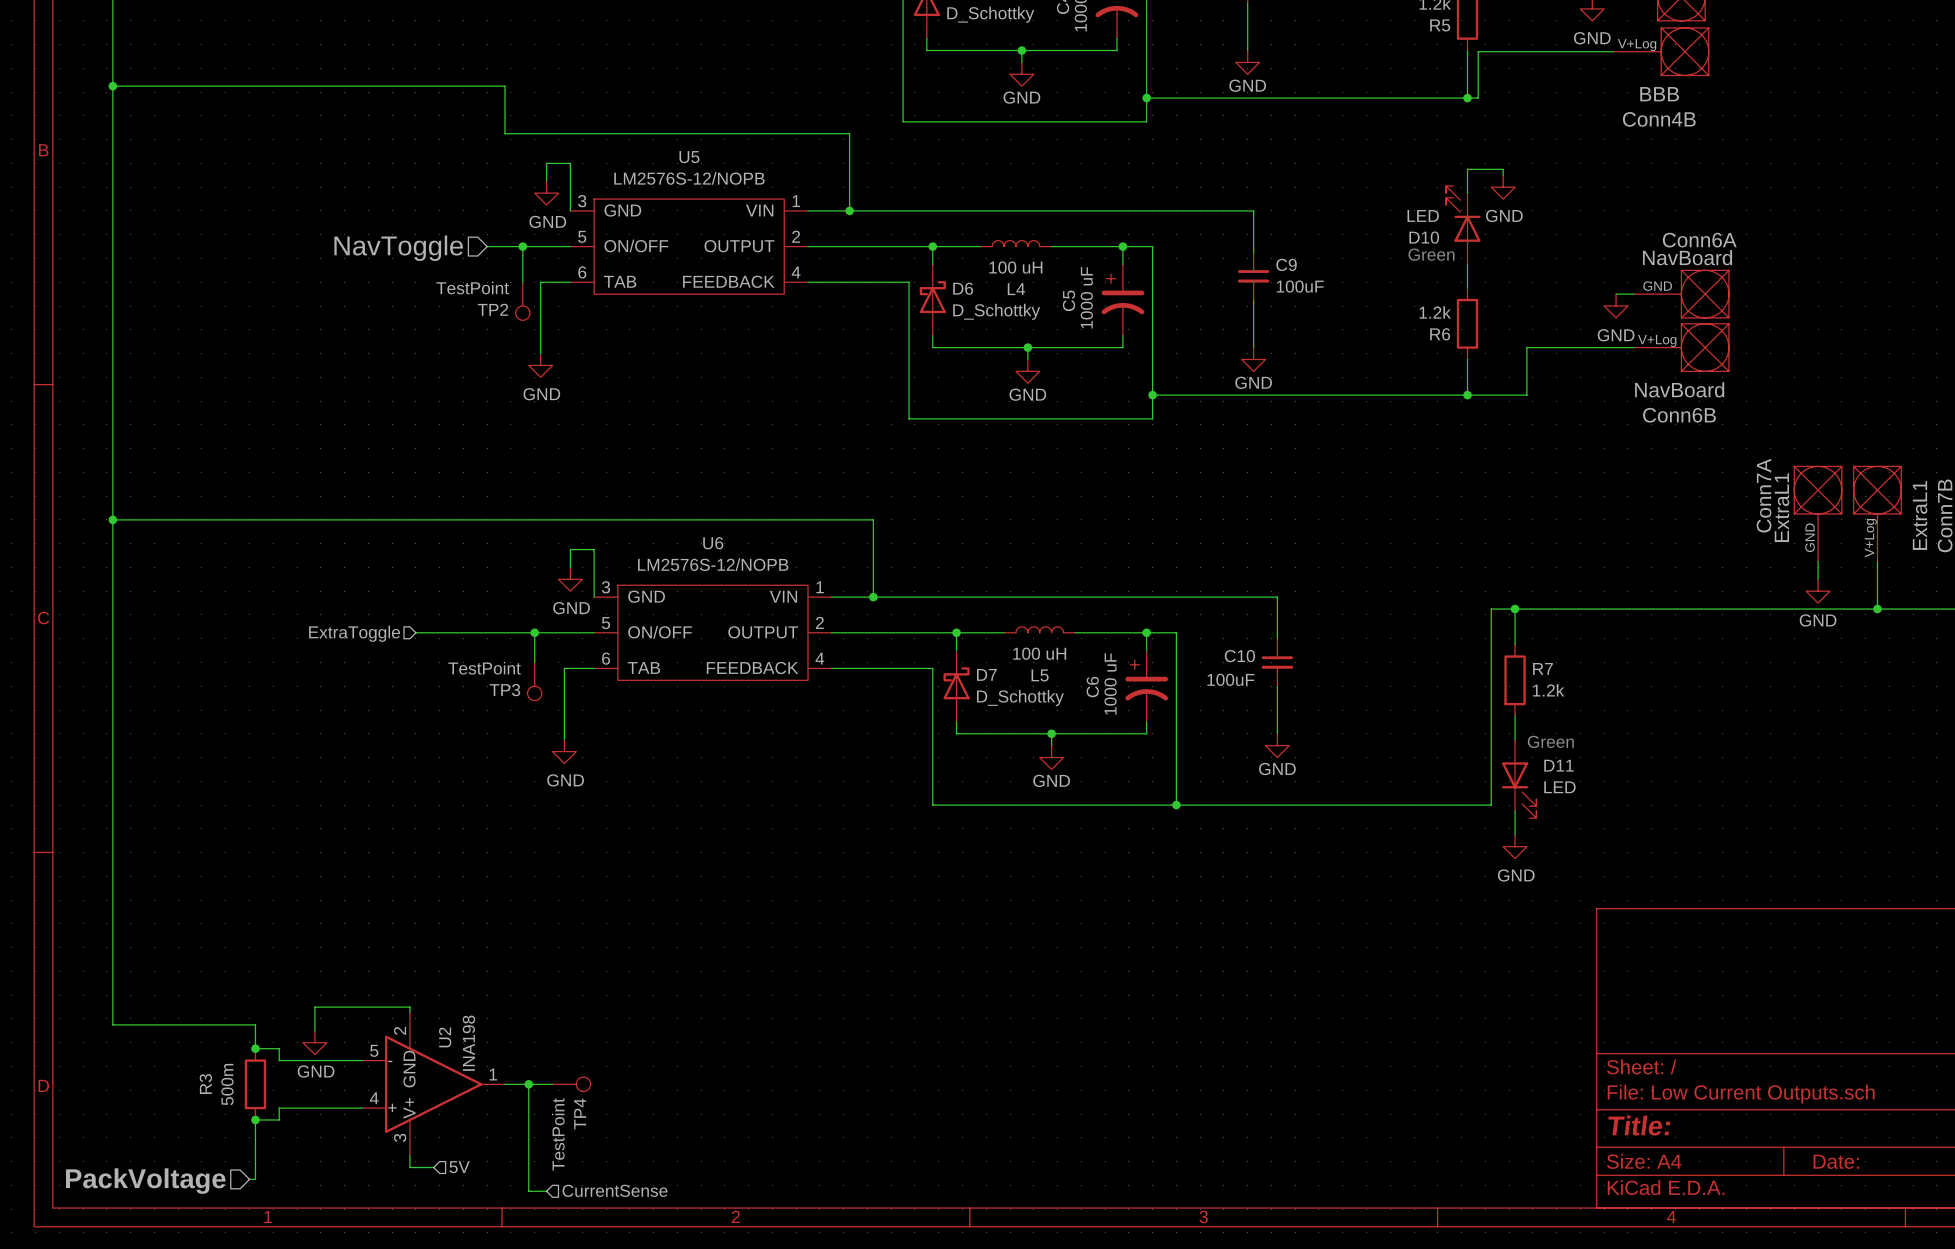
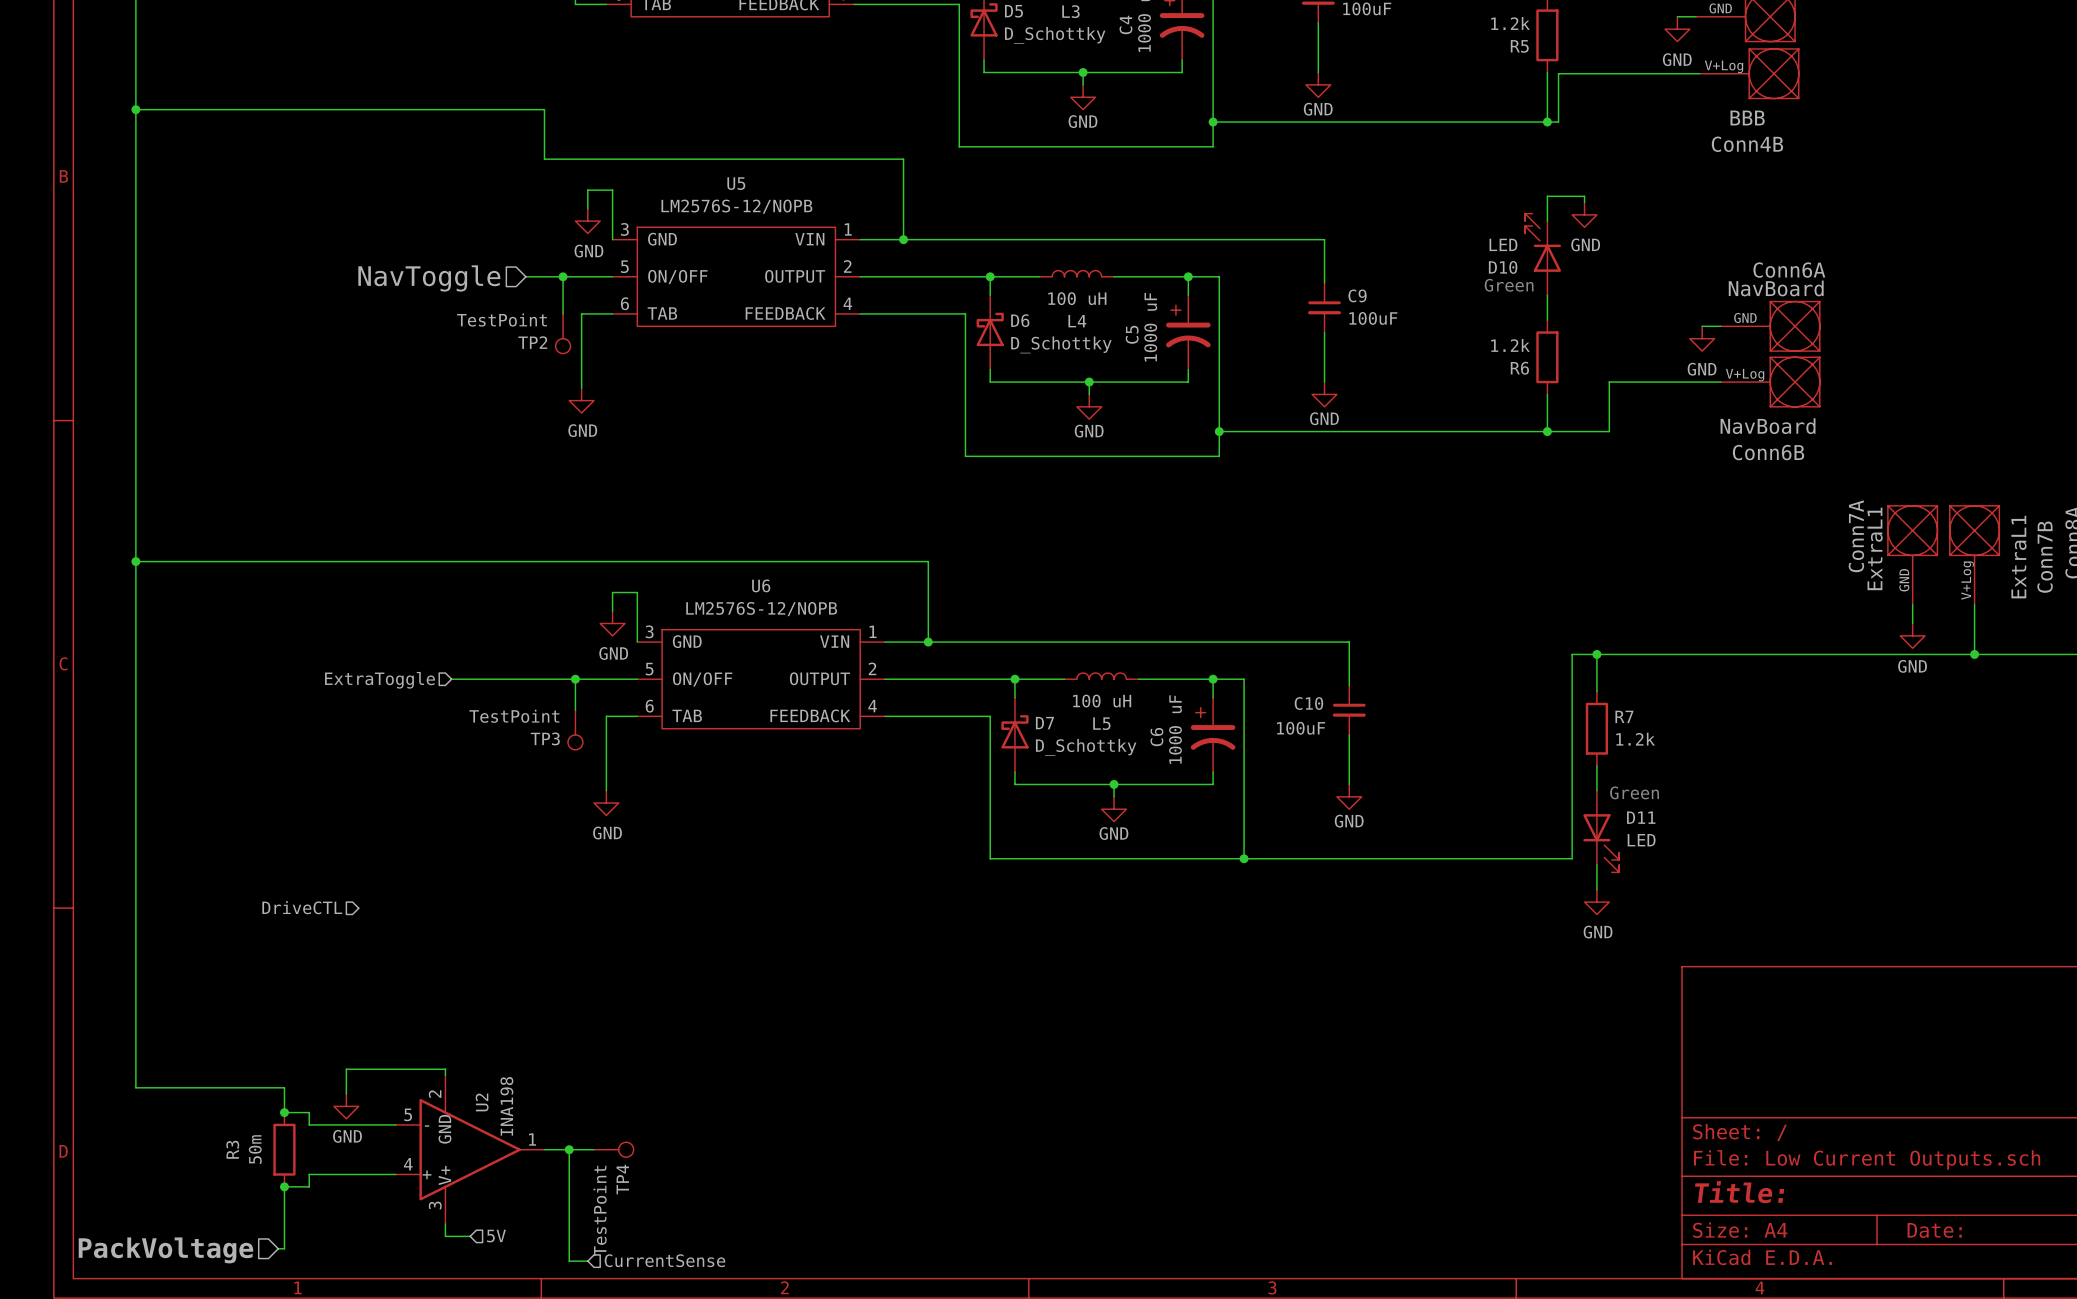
hierarchical label: none -> DriveCTL (302, 907)
R3 value: 500m (227, 1084) -> 50m (255, 1149)

